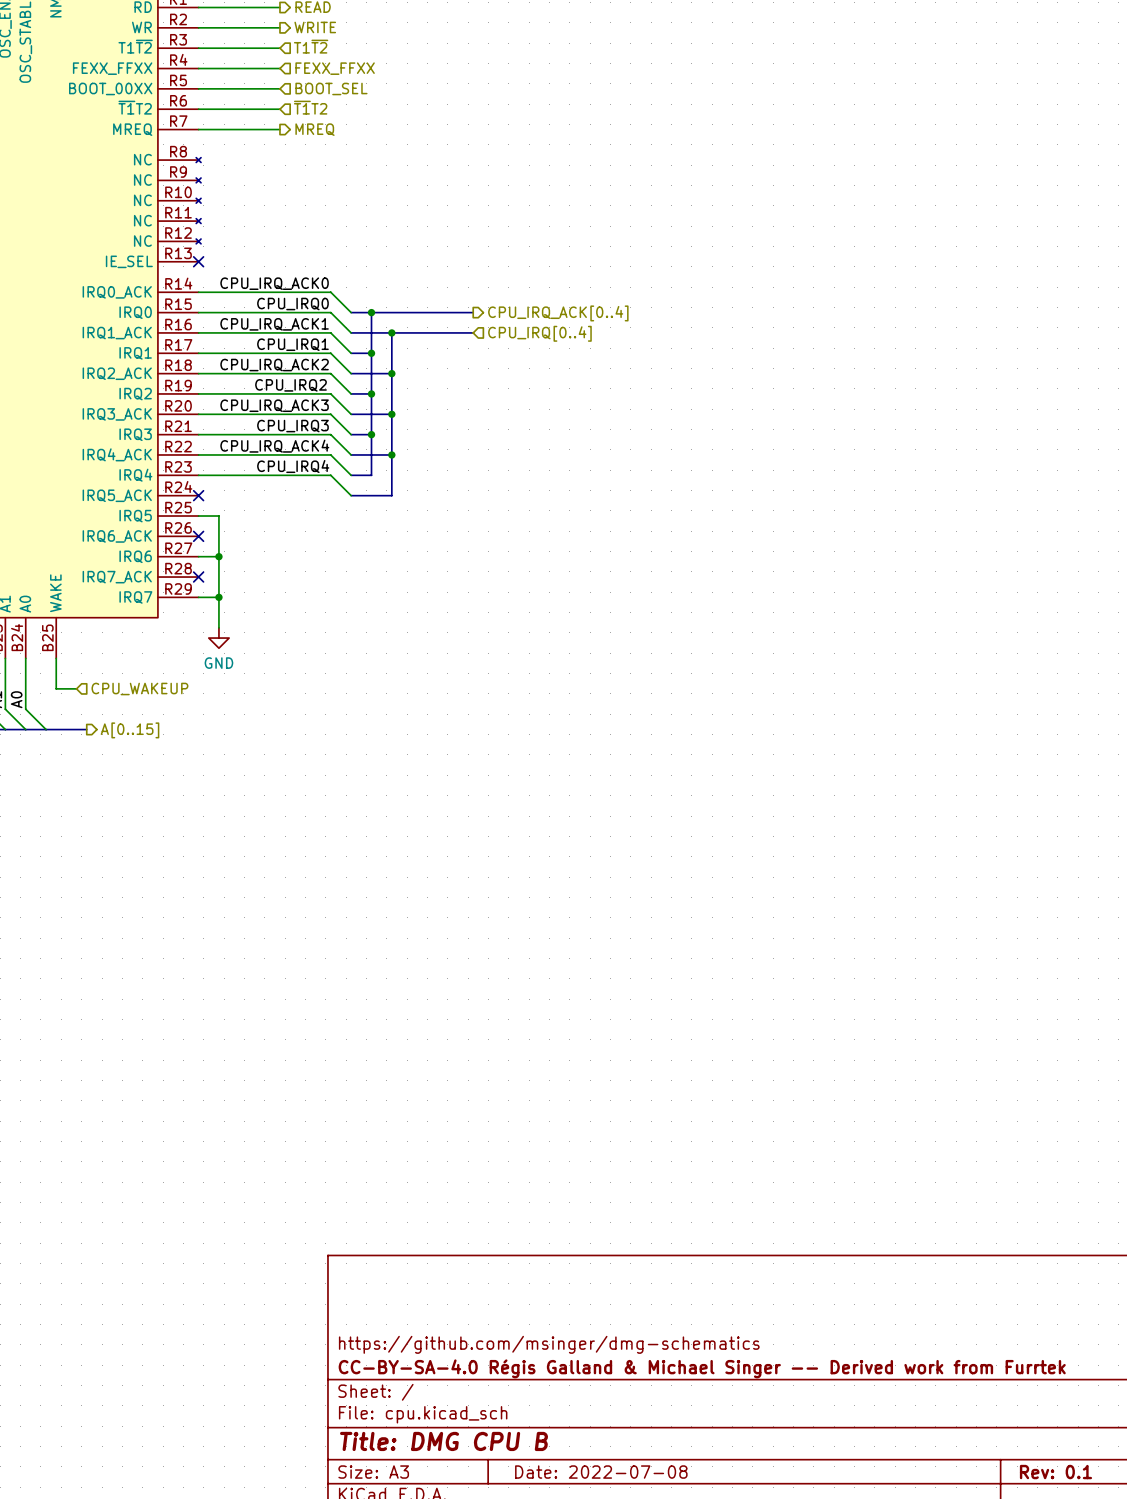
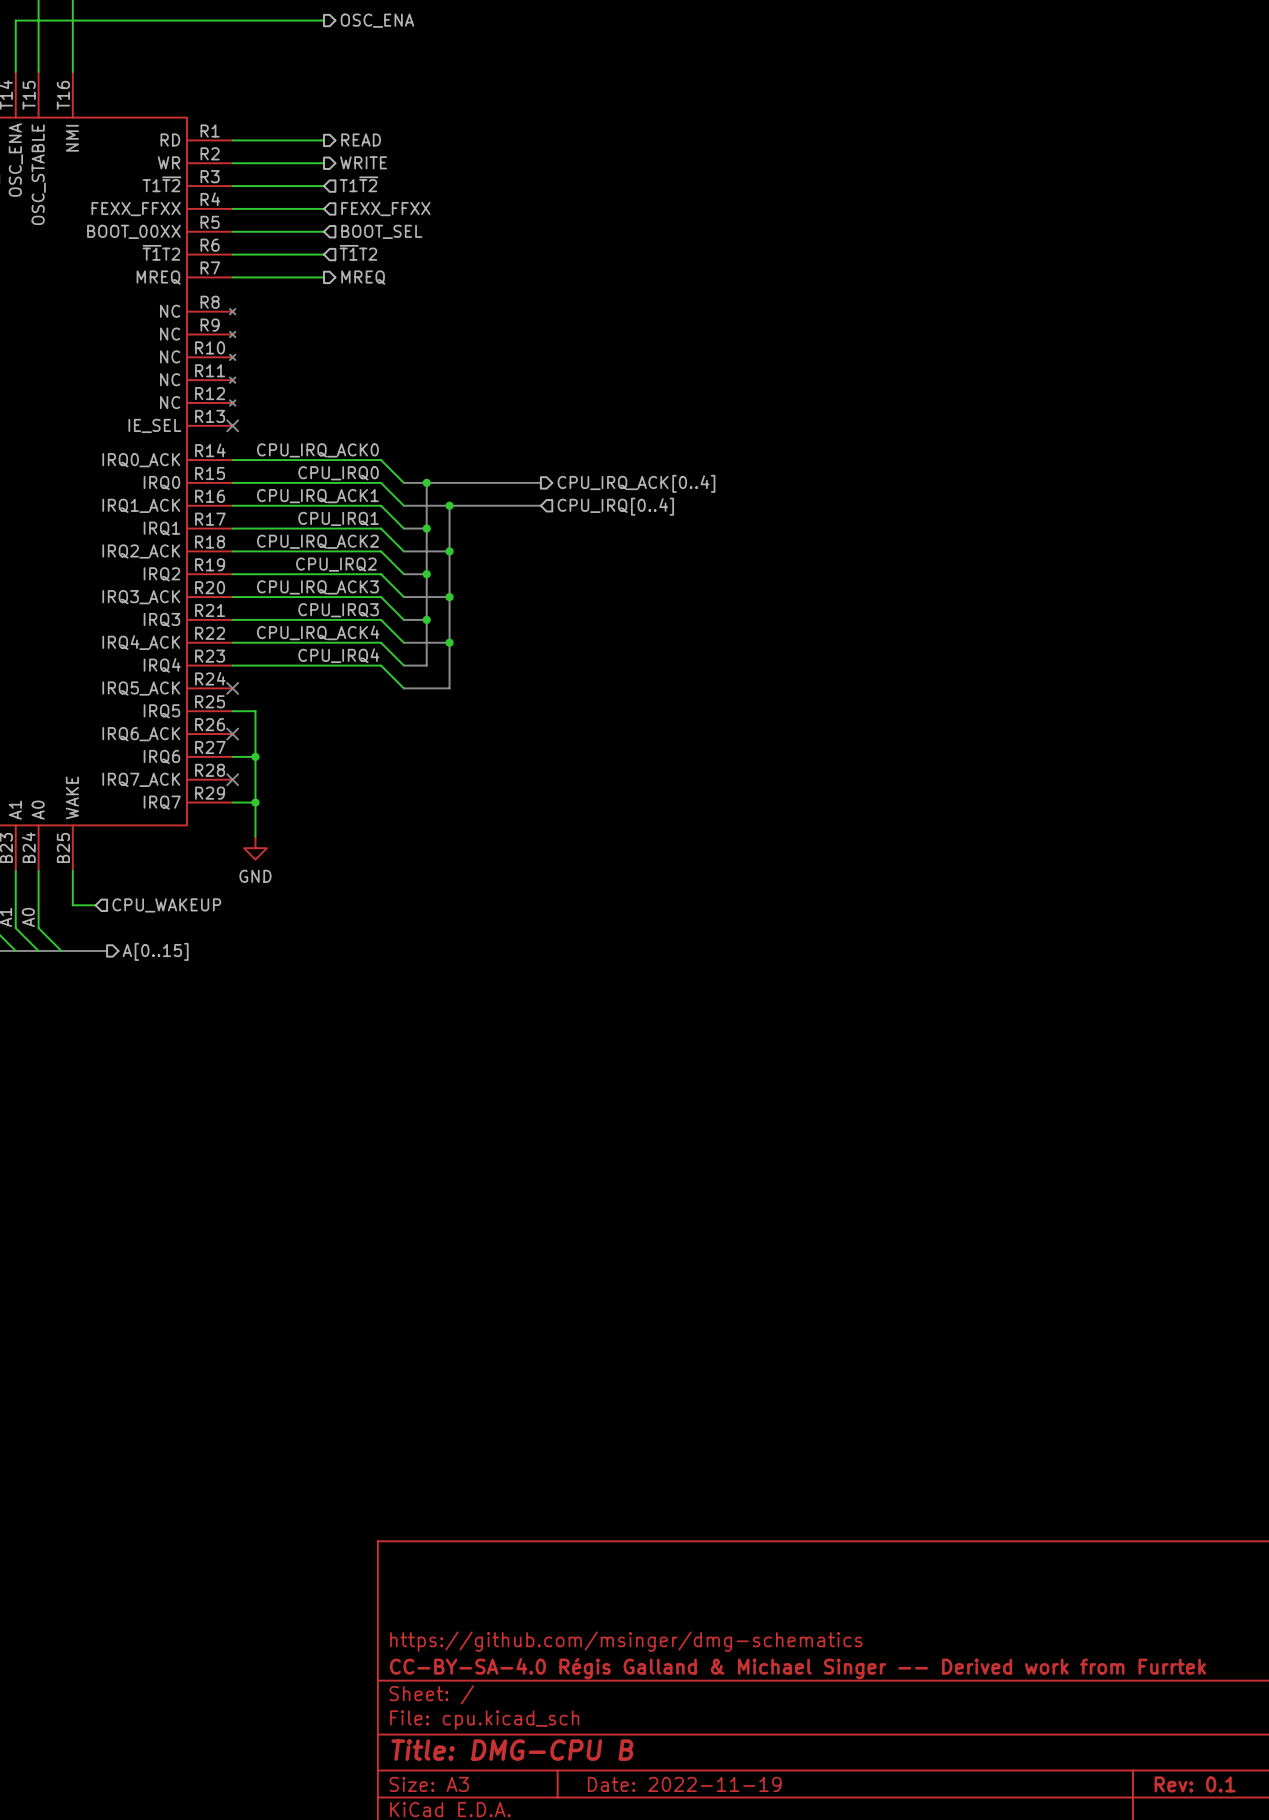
title block: Title: DMG CPU B (444, 1441) -> Title: DMG-CPU B (512, 1750)
title block: Date: 2022-07-08 (601, 1472) -> Date: 2022-11-19 (684, 1784)

